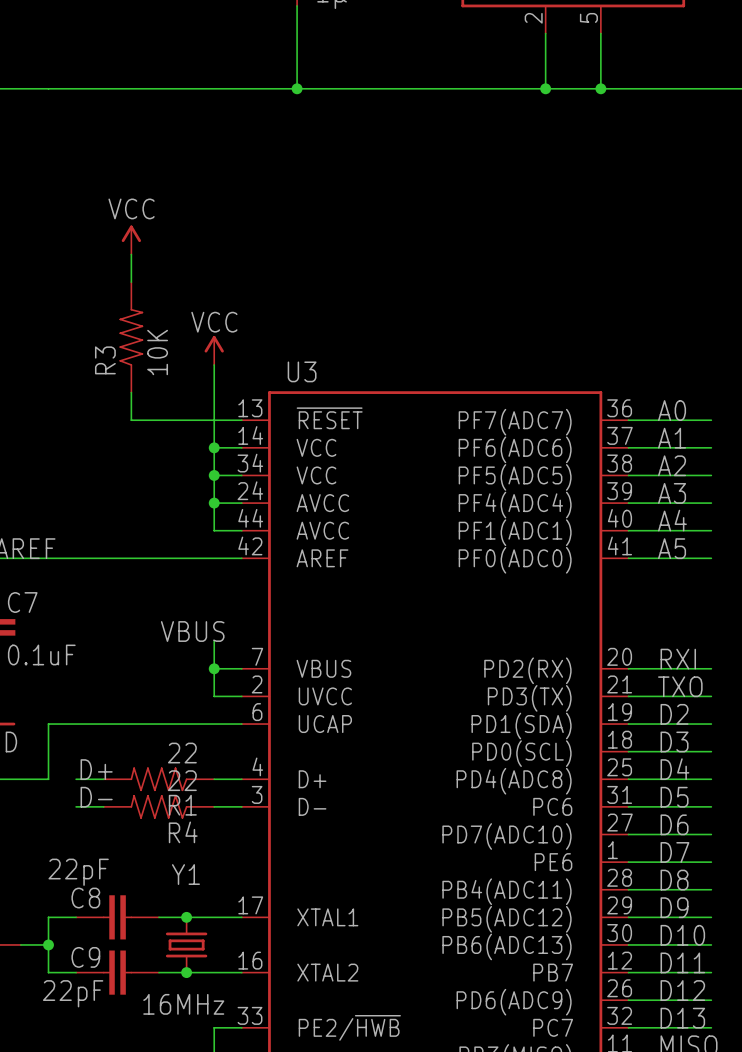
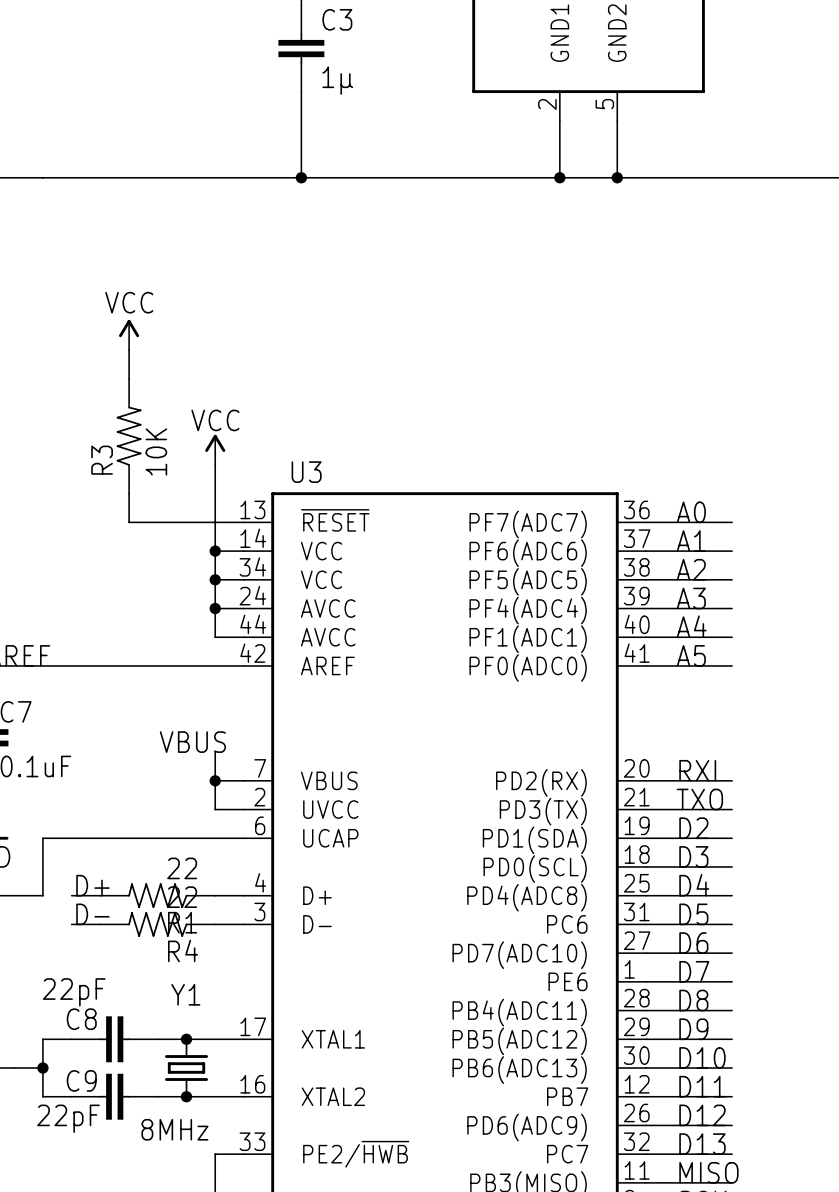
Y1 value: 16MHz (183, 1004) -> 8MHz (174, 1129)

